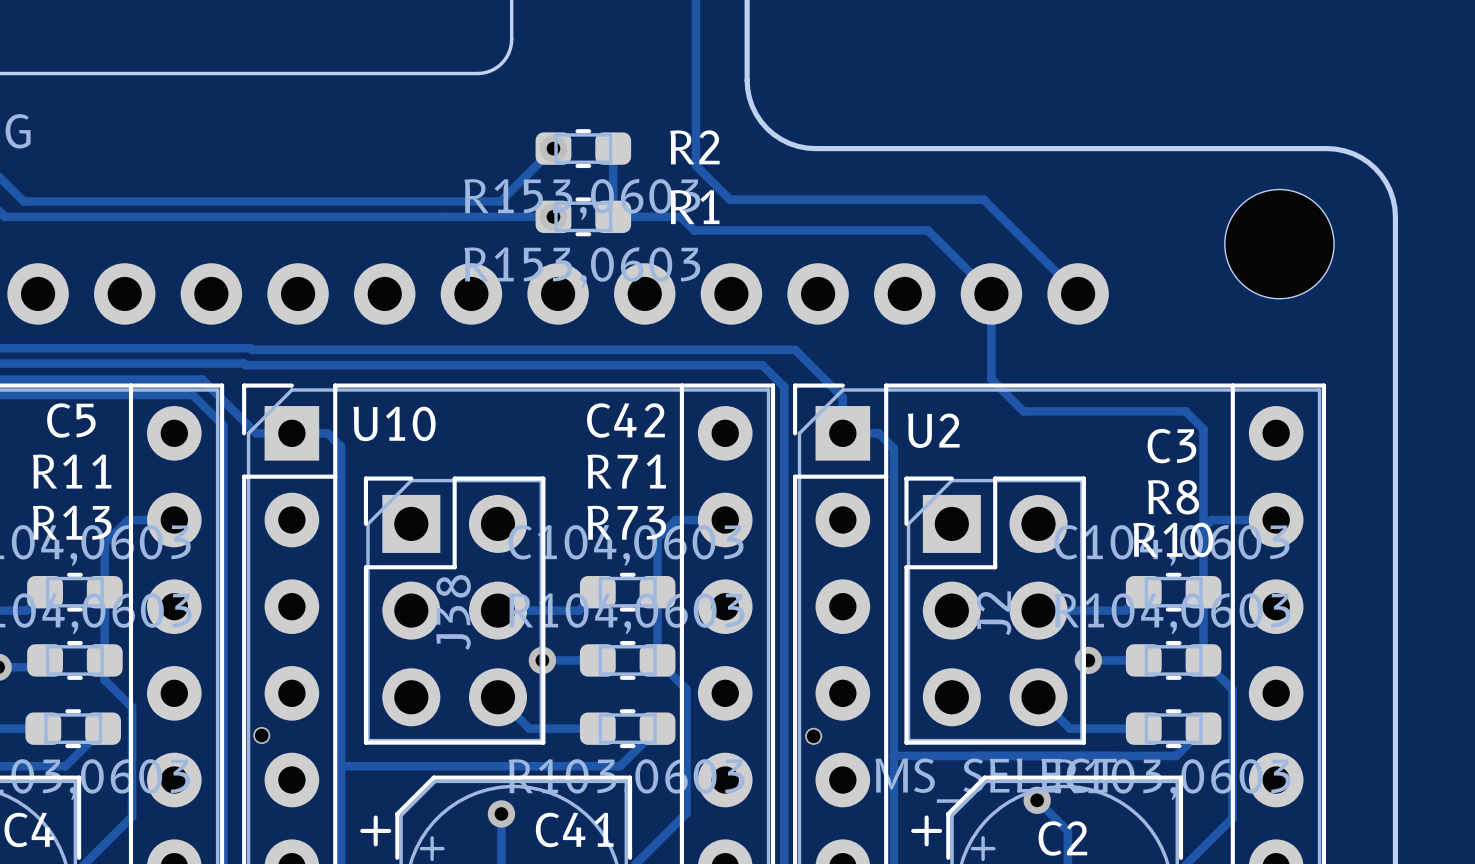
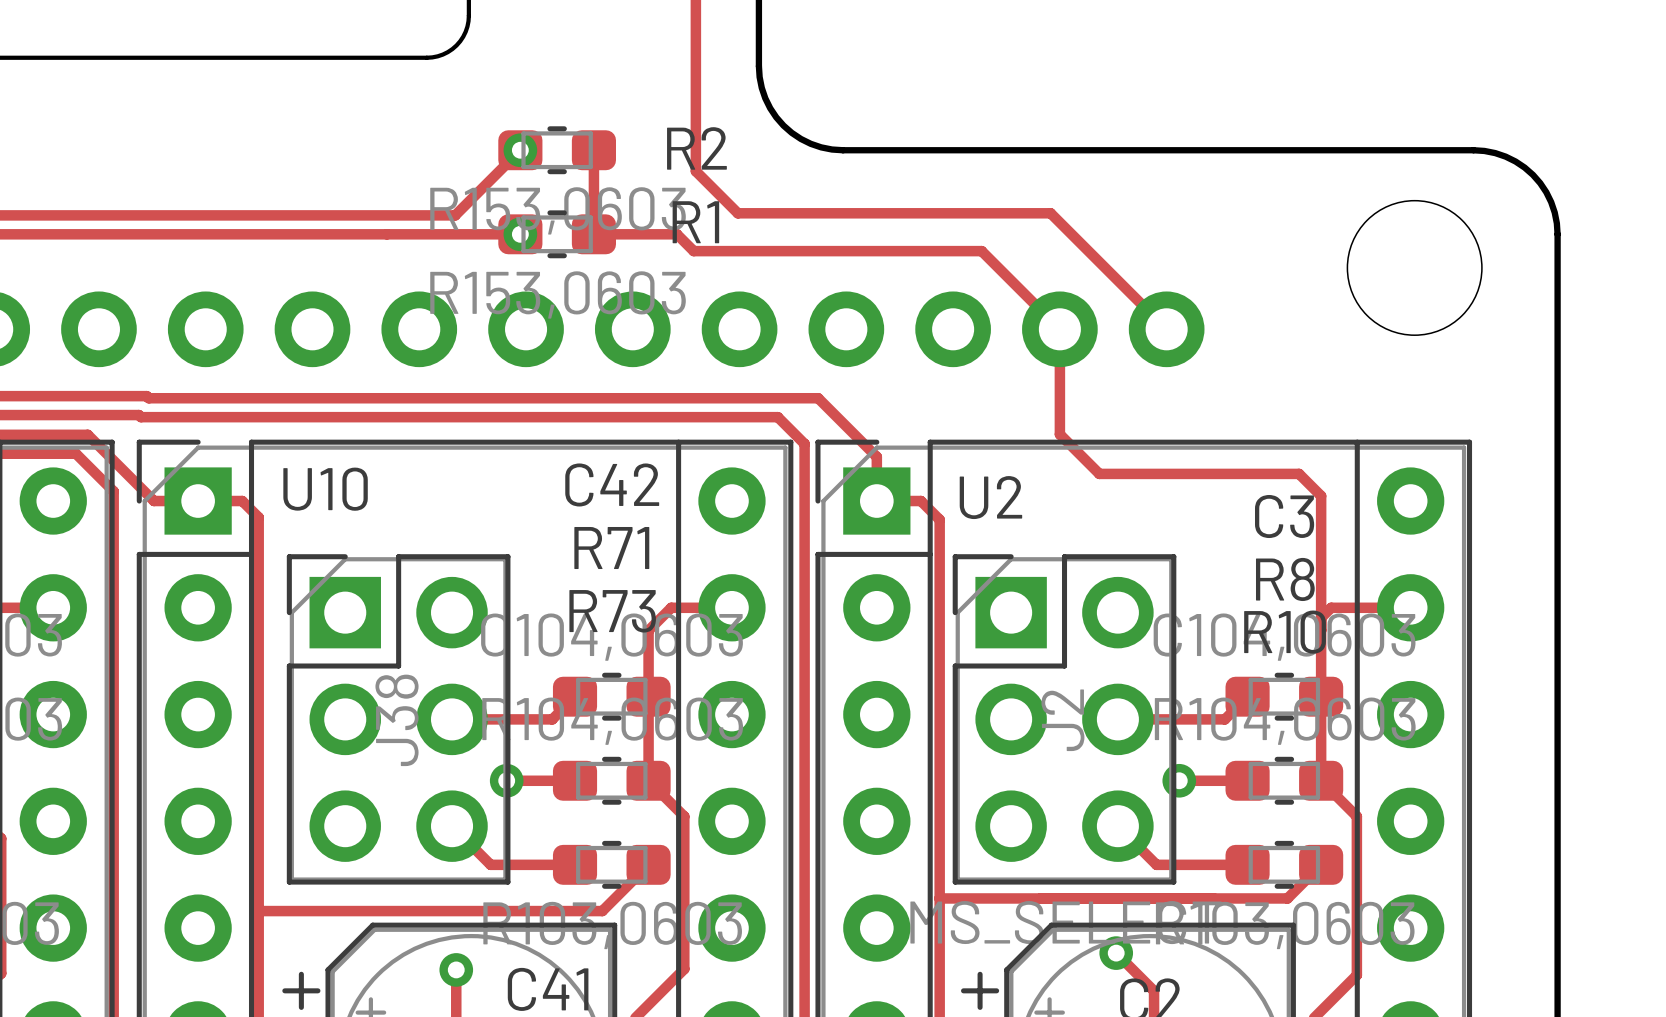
via: (261, 735) -> none
via: (813, 736) -> none

